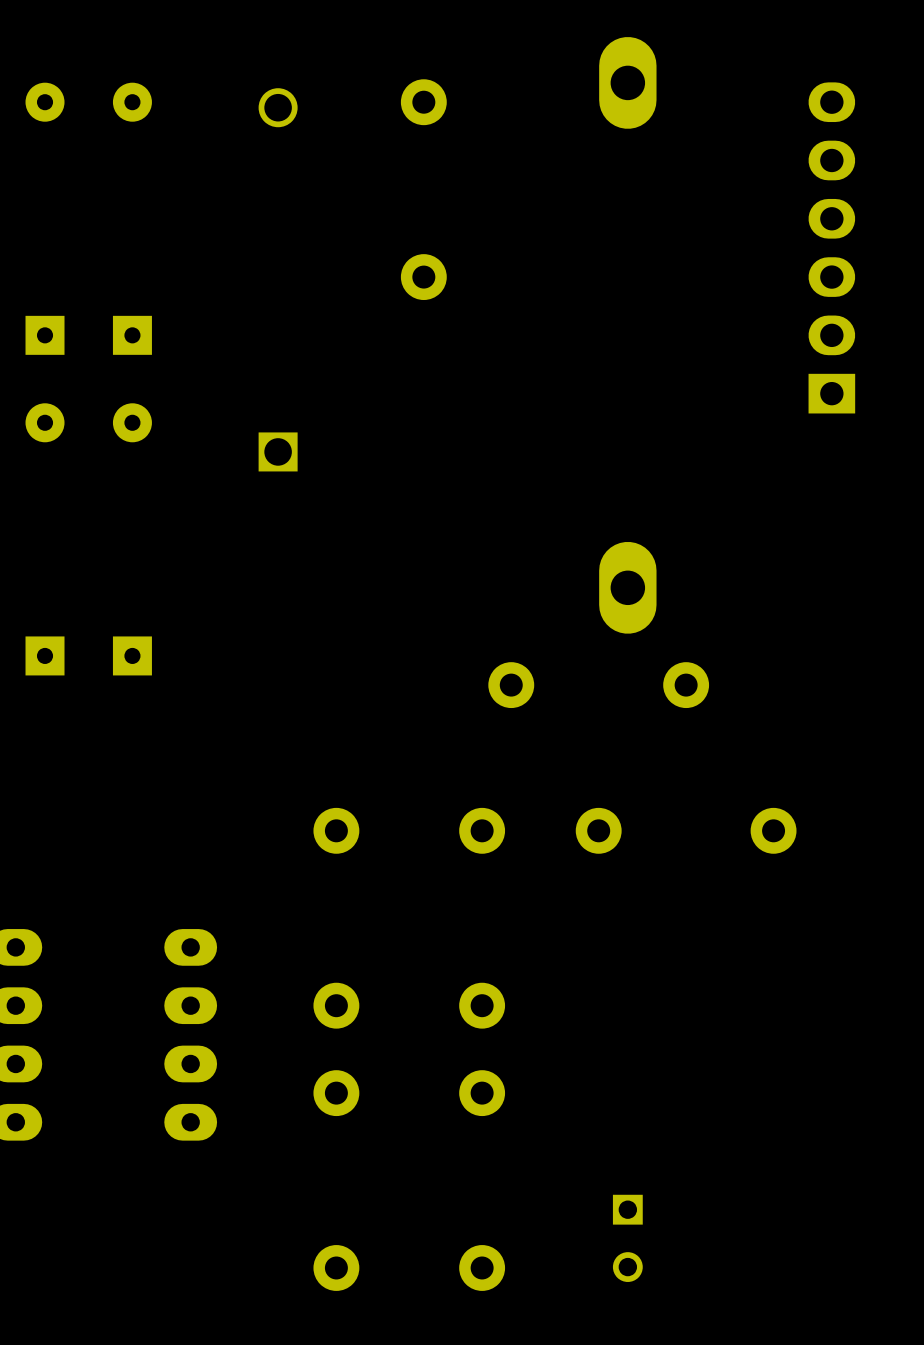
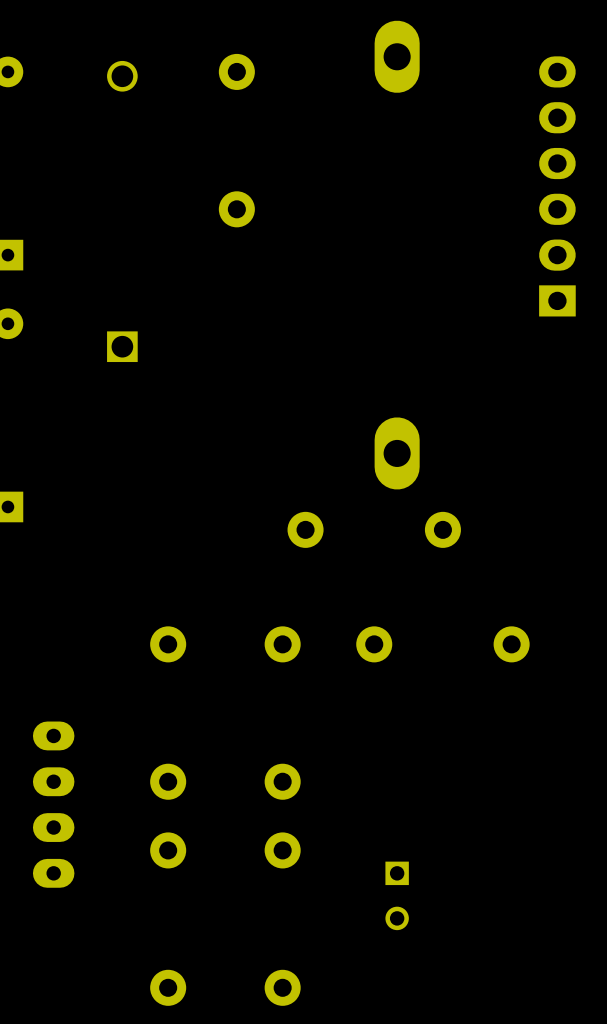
part position: (627, 1238) -> (397, 895)

